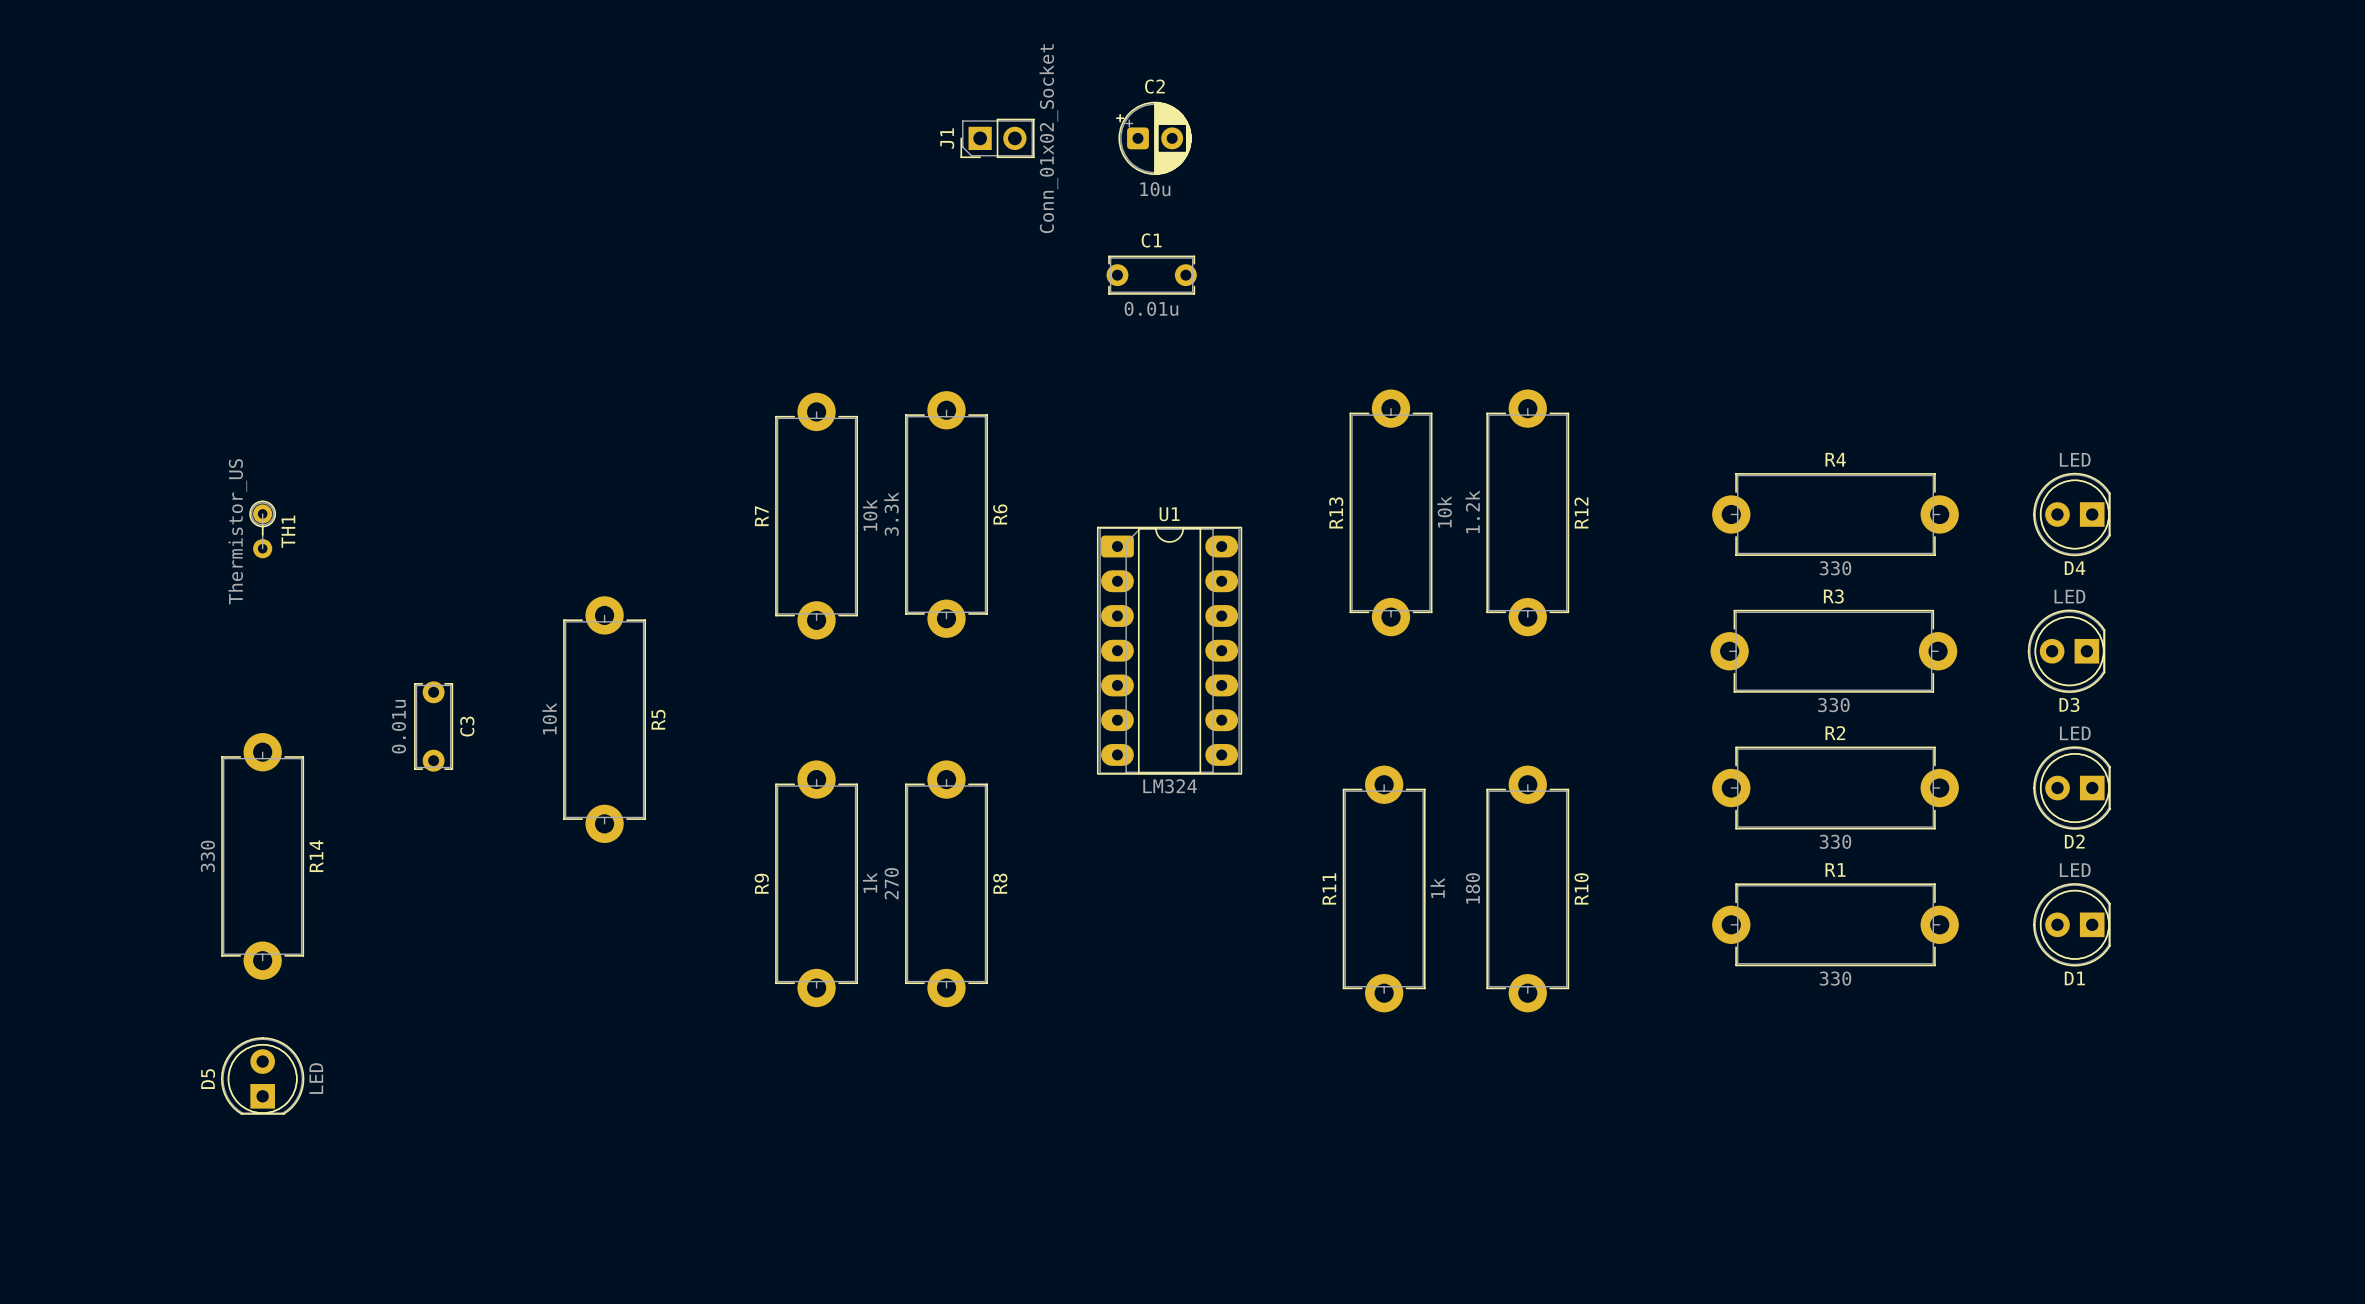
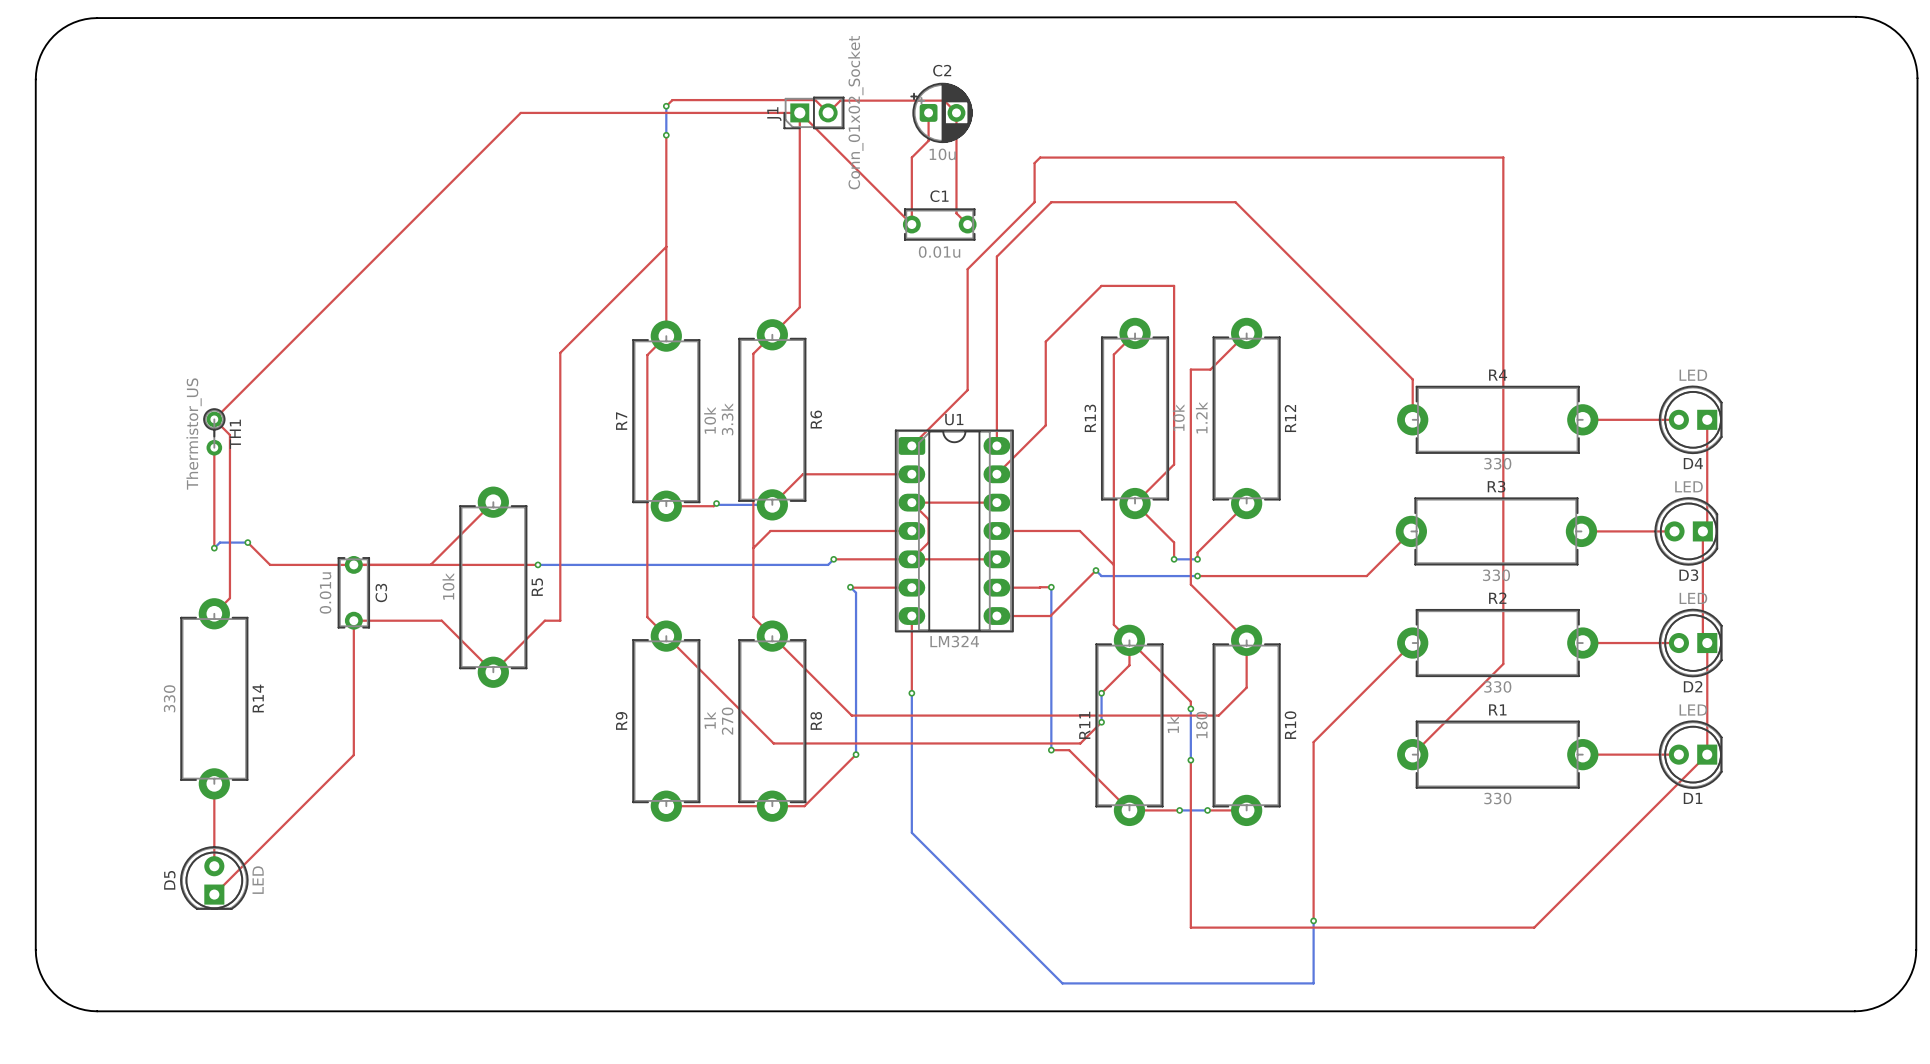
board edge: none -> (1856, 16) (97, 18) (79, 20) (68, 25) (53, 36) (43, 50) (38, 61) (35, 79) (35, 949) (36, 961) (43, 978) (53, 993) (63, 1000) (79, 1008) (97, 1011) (1854, 1011) (1866, 1010) (1883, 1004) (1898, 993) (1909, 978) (1913, 967) (1916, 949) (1917, 78) (1912, 54) (1899, 34) (1879, 21) (1856, 16)
top track: none -> (666, 106) (672, 100) (815, 100) (828, 112) (840, 100) (944, 100) (956, 112) (956, 213) (967, 224)
bottom track: none -> (666, 106) (666, 135)
via: none -> (666, 106)
top track: none -> (799, 112) (799, 307) (753, 353) (753, 617) (851, 715) (1218, 715) (1246, 687) (1246, 640) (1190, 584) (1190, 369) (1210, 369) (1246, 333)
top track: none -> (928, 112) (928, 140) (911, 157) (911, 224) (800, 112) (520, 112) (214, 419) (229, 435) (229, 598) (214, 613)
top track: none -> (666, 135) (666, 336) (647, 355) (647, 617) (773, 743) (1080, 743) (1101, 722)
via: none -> (666, 135)
top track: none -> (666, 246) (560, 352) (560, 620) (544, 620) (493, 672) (441, 620) (353, 620) (353, 755) (214, 894)
top track: none -> (1135, 333) (1113, 354) (1113, 624) (1190, 701) (1190, 708)
top track: none -> (1412, 419) (1412, 379) (1235, 202) (1051, 202) (996, 256) (996, 445)
top track: none -> (1582, 419) (1678, 419)
top track: none -> (1707, 419) (1707, 522) (1702, 527) (1702, 636) (1707, 640) (1707, 752)
top track: none -> (911, 445) (967, 390) (967, 269) (1034, 202) (1034, 163) (1040, 157) (1503, 157) (1503, 664) (1412, 754)
top track: none -> (214, 447) (214, 548)
top track: none -> (911, 474) (802, 474) (772, 504)
top track: none -> (996, 474) (1045, 425) (1045, 341) (1101, 285) (1174, 285) (1174, 464) (1135, 503) (1174, 542) (1174, 559)
top track: none -> (493, 502) (430, 564)
top track: none -> (996, 502) (911, 502) (928, 519) (928, 542) (911, 559)
top track: none -> (716, 503) (713, 506) (666, 506)
bottom track: none -> (716, 503) (772, 504)
via: none -> (716, 503)
top track: none -> (1246, 503) (1197, 552) (1197, 559)
top track: none -> (911, 530) (770, 530) (753, 548)
top track: none -> (996, 530) (1079, 530) (1113, 564)
top track: none -> (1411, 531) (1366, 576) (1197, 576)
top track: none -> (1581, 531) (1674, 531)
top track: none -> (247, 542) (270, 564) (537, 564)
bottom track: none -> (247, 542) (219, 542) (214, 548)
via: none -> (247, 542)
via: none -> (214, 548)
top track: none -> (833, 559) (996, 559)
bottom track: none -> (833, 559) (828, 564) (537, 564)
via: none -> (833, 559)
bottom track: none -> (1174, 559) (1197, 559)
via: none -> (1174, 559)
via: none -> (1197, 559)
via: none -> (537, 564)
top track: none -> (1095, 570) (1050, 616) (996, 616)
bottom track: none -> (1095, 570) (1101, 576) (1197, 576)
via: none -> (1095, 570)
via: none -> (1197, 576)
top track: none -> (850, 587) (911, 587)
bottom track: none -> (850, 587) (856, 592) (856, 754)
via: none -> (850, 587)
top track: none -> (1051, 587) (996, 587)
bottom track: none -> (1051, 587) (1051, 750)
via: none -> (1051, 587)
top track: none -> (911, 616) (911, 693)
top track: none -> (1129, 640) (1129, 665) (1101, 693)
top track: none -> (1412, 643) (1313, 742) (1313, 920)
top track: none -> (1582, 643) (1678, 643)
bottom track: none -> (911, 693) (911, 832) (1062, 983) (1313, 983) (1313, 920)
via: none -> (911, 693)
bottom track: none -> (1101, 693) (1101, 722)
via: none -> (1101, 693)
bottom track: none -> (1190, 708) (1190, 760)
via: none -> (1190, 708)
via: none -> (1101, 722)
top track: none -> (1051, 750) (1069, 750) (1129, 810) (1179, 810)
via: none -> (1051, 750)
top track: none -> (1707, 752) (1707, 754) (1534, 927) (1190, 927) (1190, 760)
top track: none -> (856, 754) (804, 806) (666, 806)
via: none -> (856, 754)
top track: none -> (1582, 754) (1678, 754)
via: none -> (1190, 760)
top track: none -> (214, 783) (214, 866)
bottom track: none -> (1179, 810) (1207, 810)
via: none -> (1179, 810)
top track: none -> (1207, 810) (1246, 810)
via: none -> (1207, 810)
via: none -> (1313, 920)

